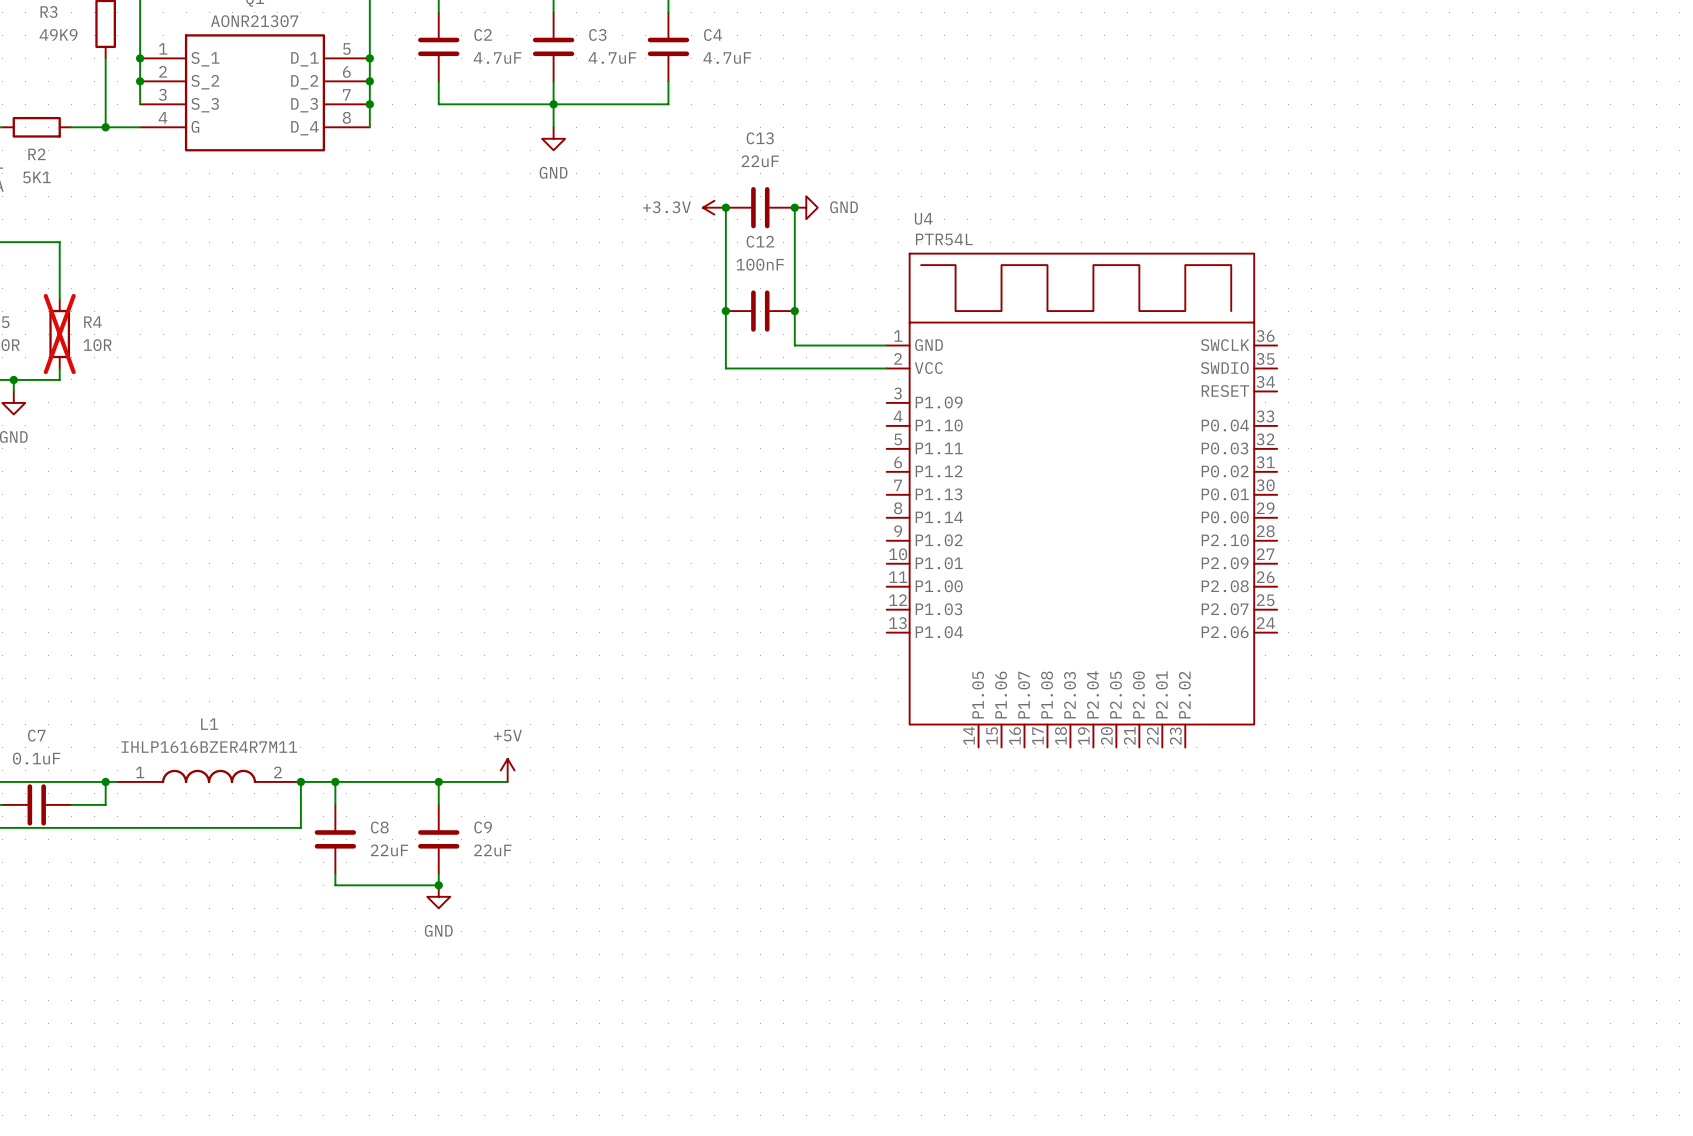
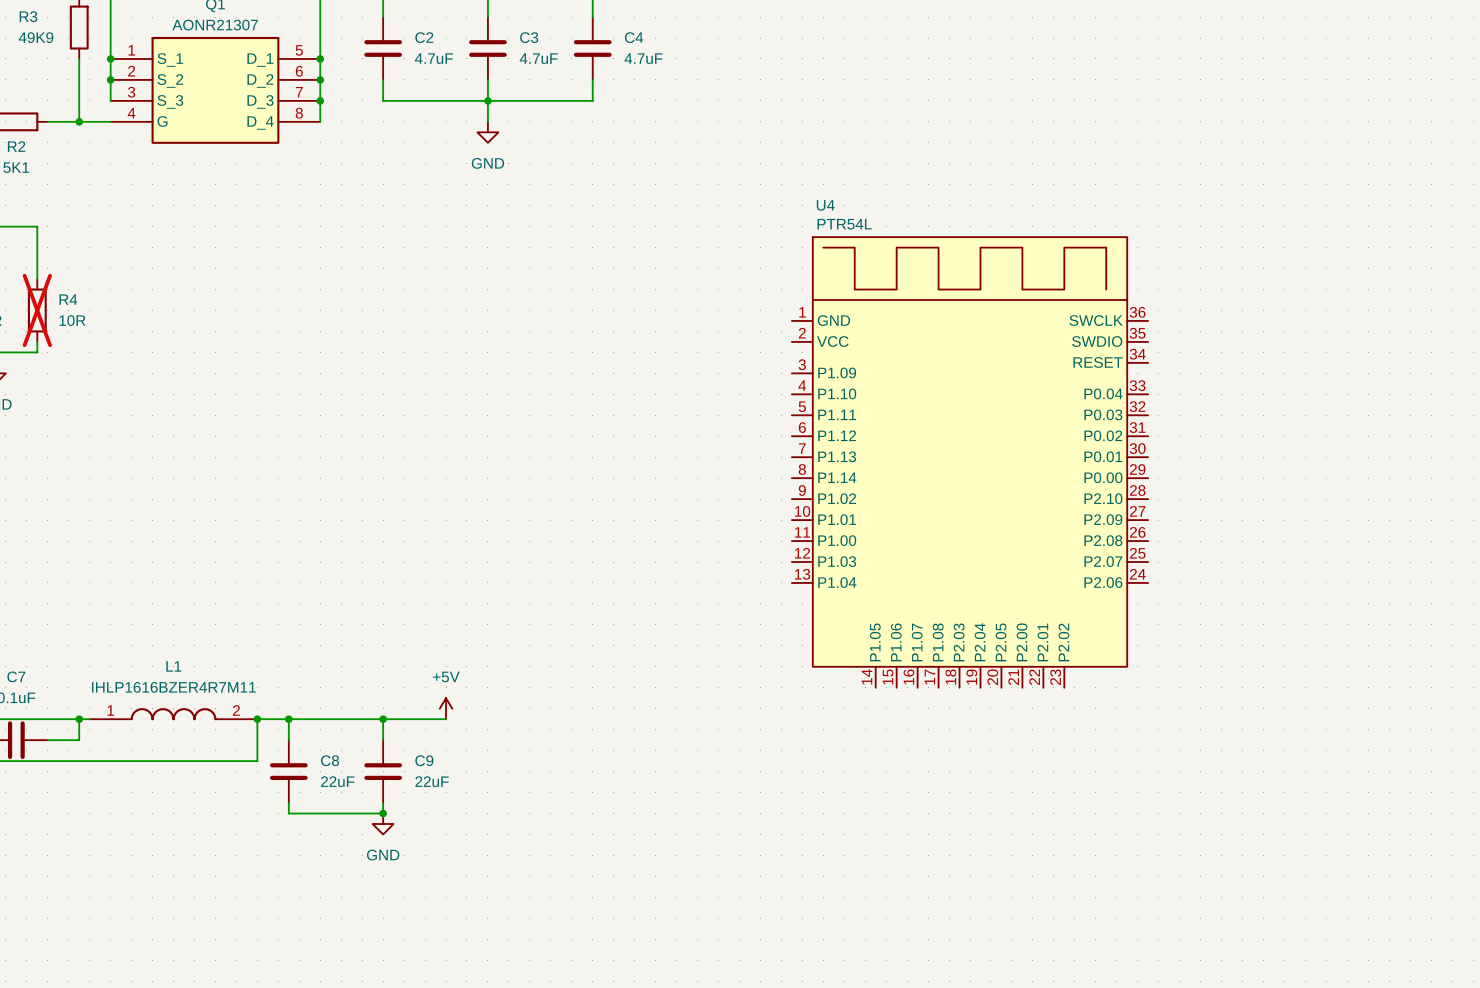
power symbol: +3.3V (714, 207) -> none
wire: (725, 207) (725, 368) (886, 368) -> none
junction: (725, 207) -> none
C13: 22uF (760, 207) -> none
wire: (794, 207) (794, 345) (886, 345) -> none
junction: (794, 207) -> none
power symbol: GND (806, 207) -> none
junction: (725, 311) -> none
C12: 100nF (760, 311) -> none
junction: (794, 311) -> none

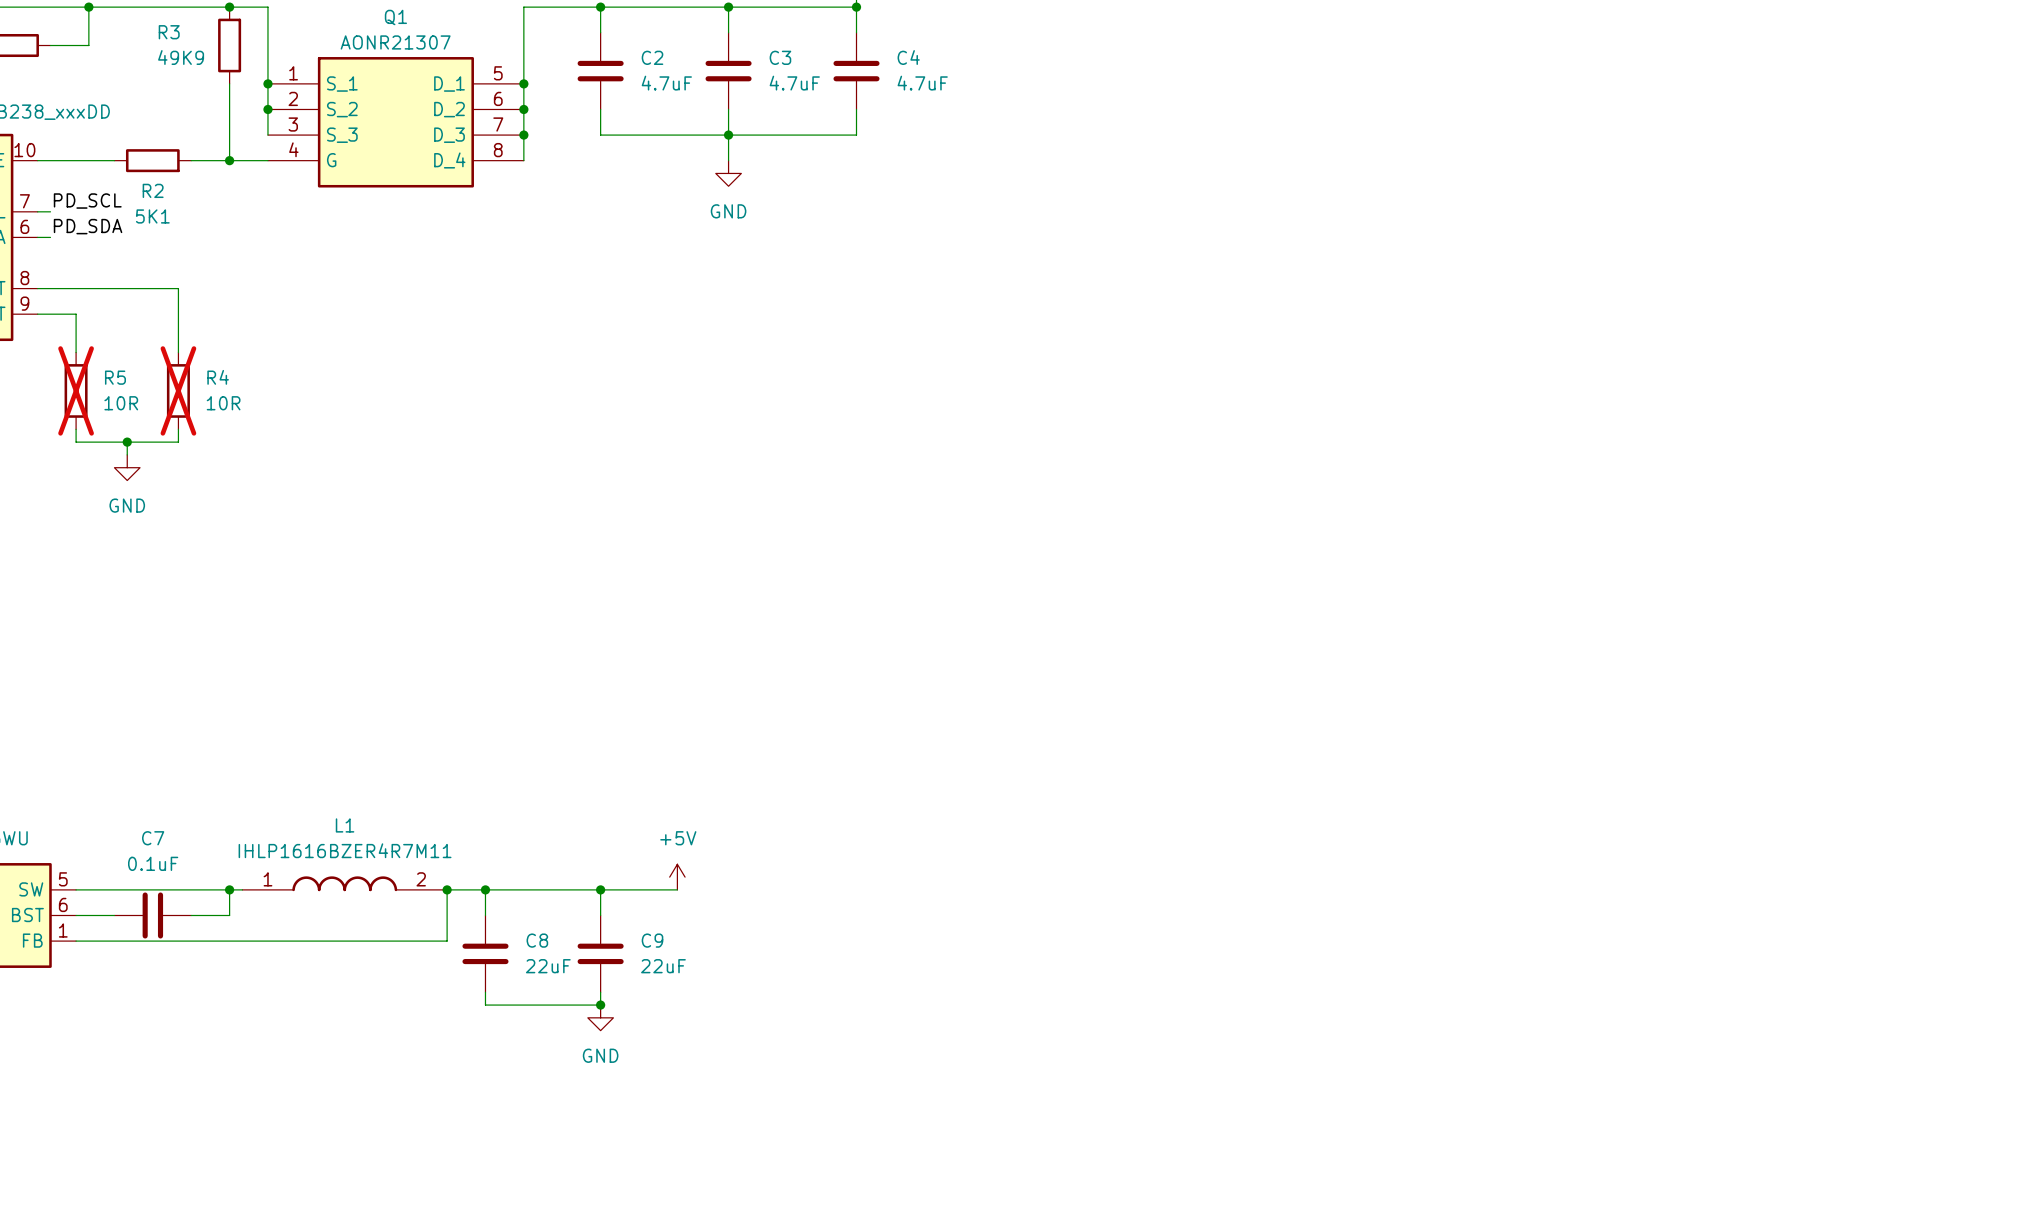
U4: PTR54L (970, 462) -> none

